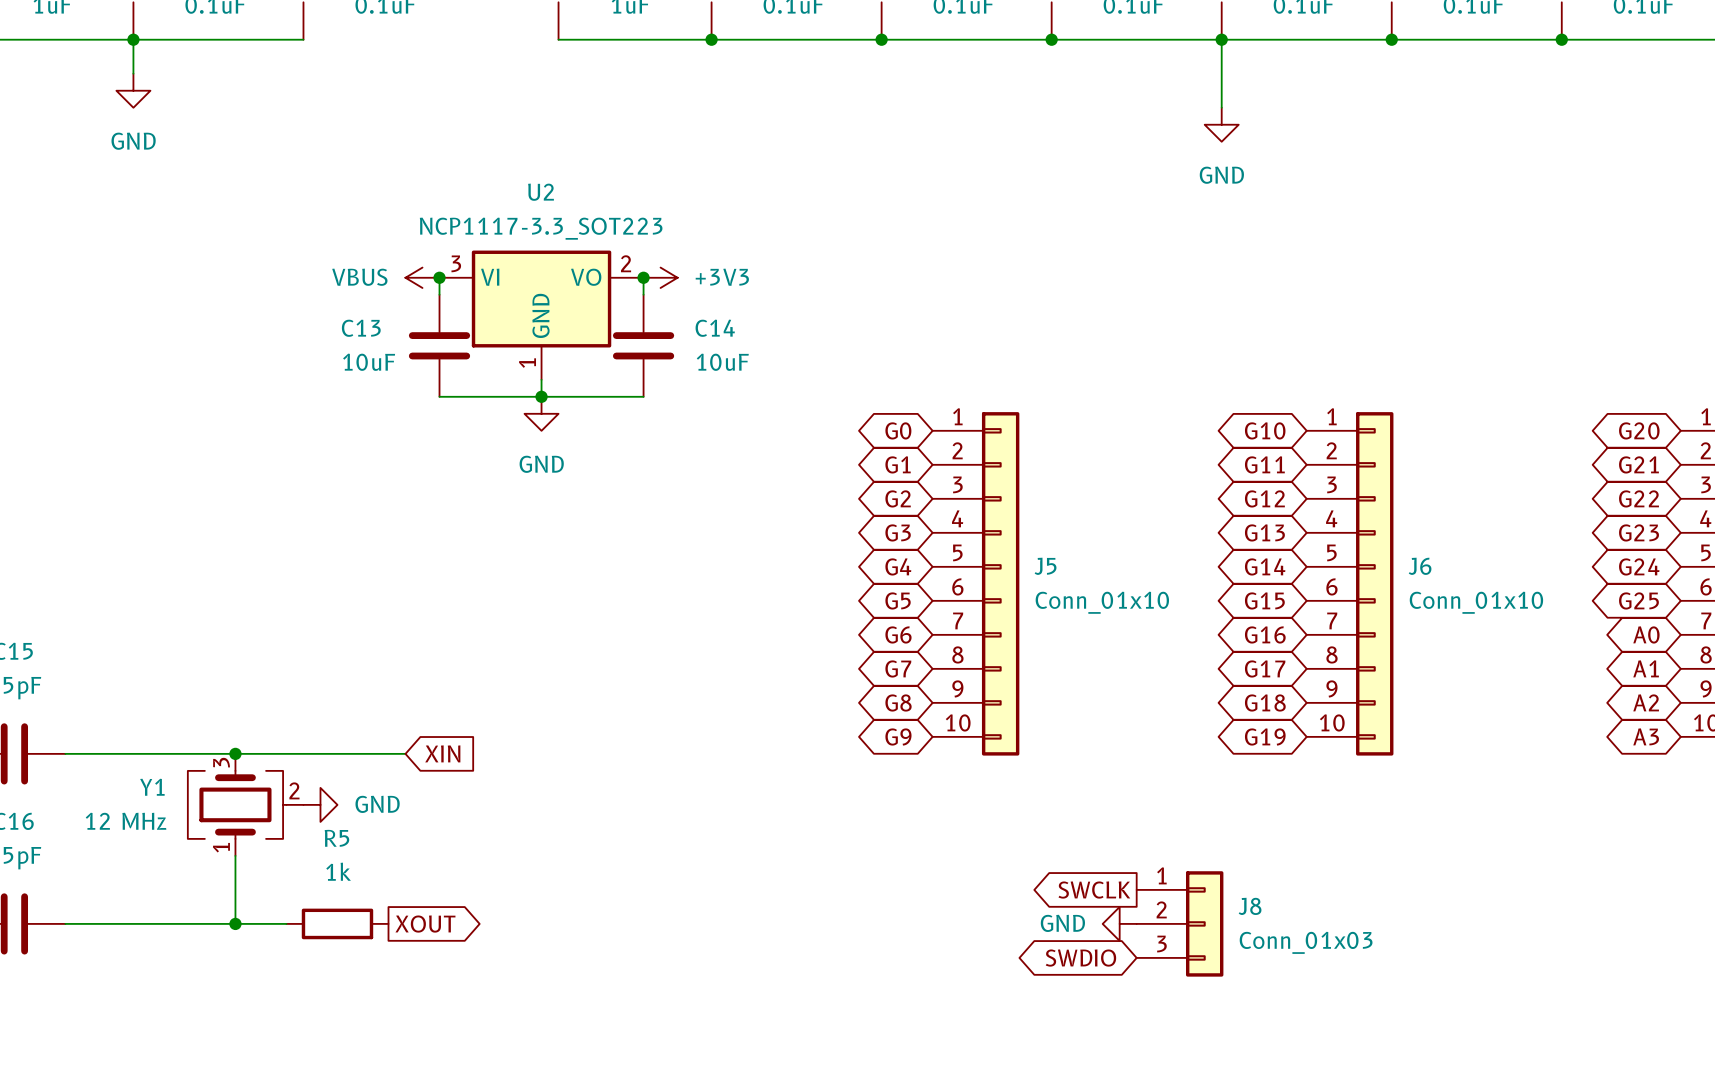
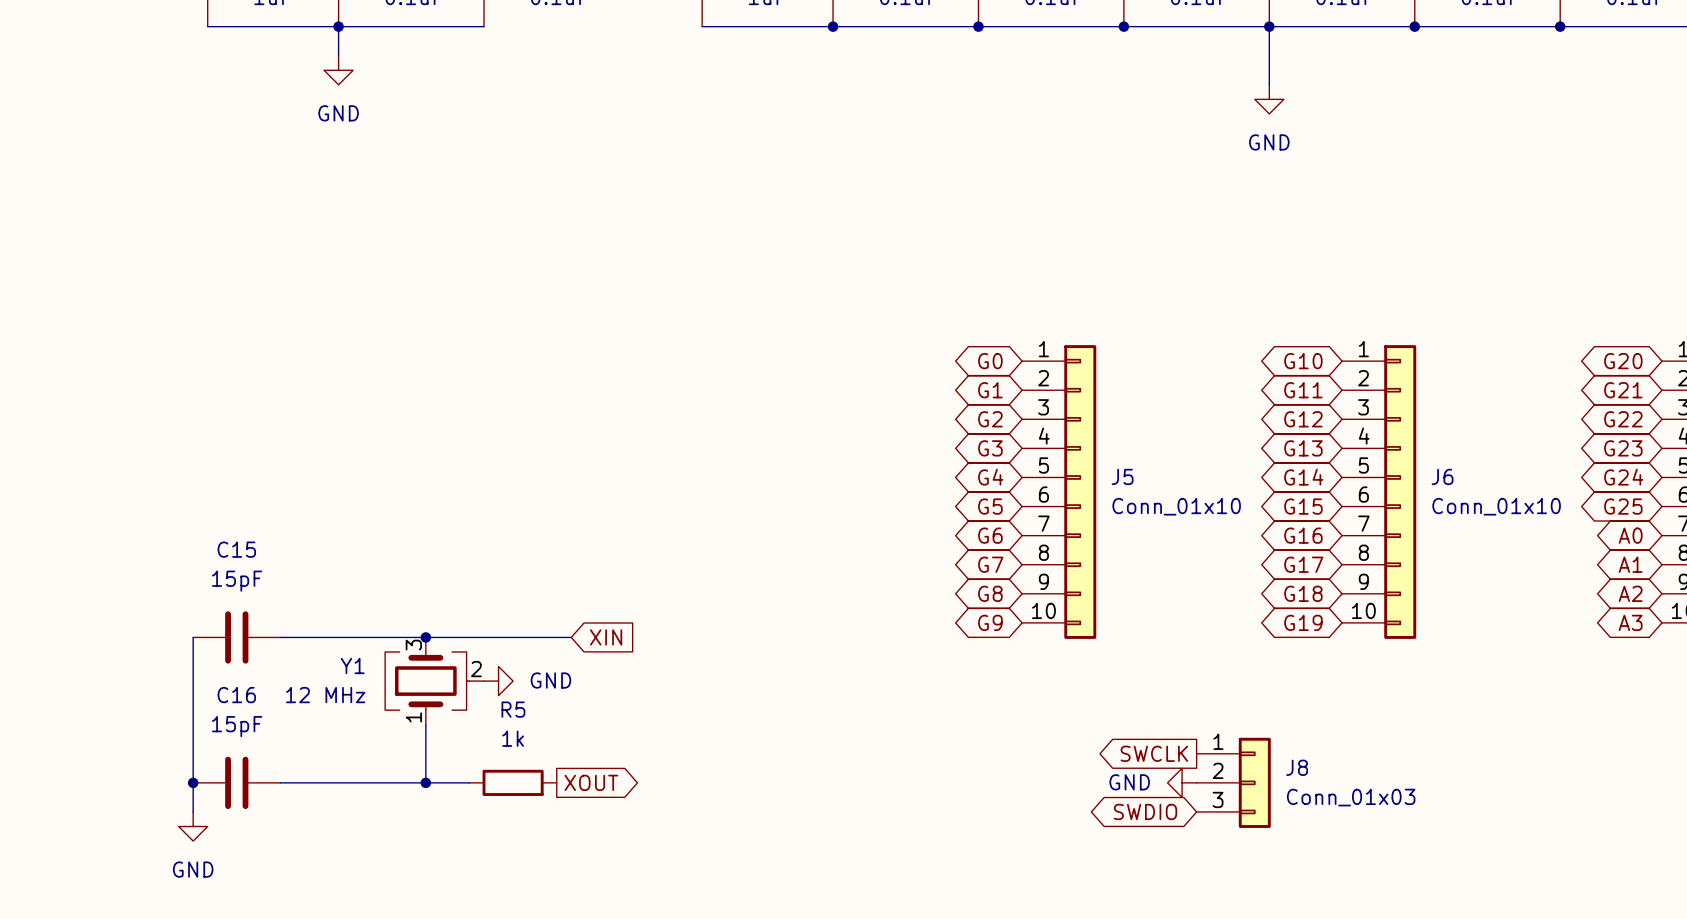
power symbol: VBUS (422, 277) -> none
wire: (439, 277) (439, 294) -> none
junction: (439, 277) -> none
wire: (643, 277) (643, 294) -> none
junction: (643, 277) -> none
power symbol: +3V3 (660, 277) -> none
U2: NCP1117-3.3_SOT223 (541, 315) -> none
C13: 10uF (439, 345) -> none
C14: 10uF (643, 345) -> none
wire: (541, 379) (541, 396) -> none
wire: (439, 396) (643, 396) -> none
junction: (541, 396) -> none
power symbol: GND (541, 413) -> none

